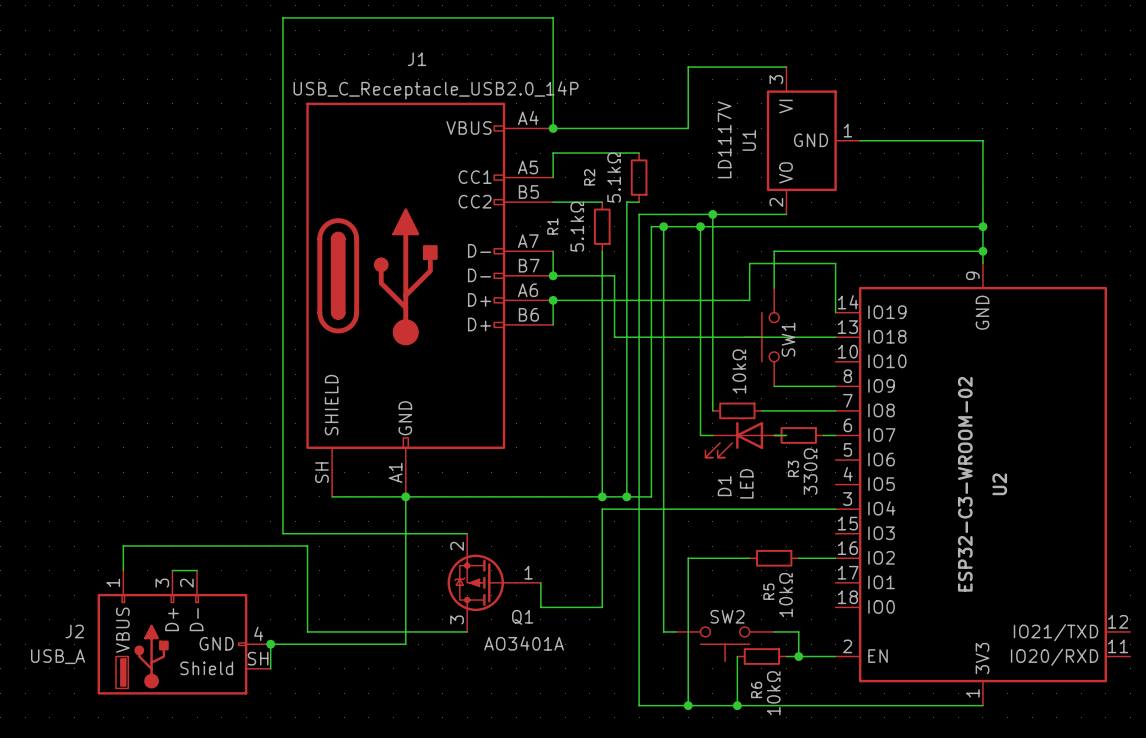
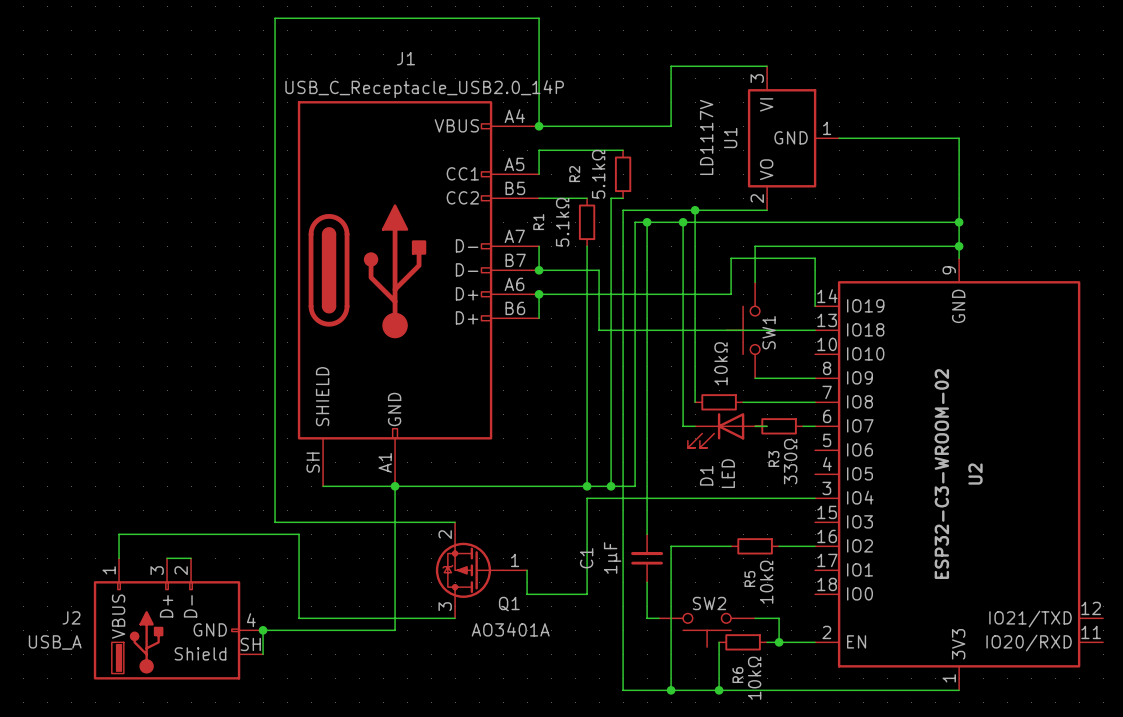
C1: none -> 1µF (647, 558)

